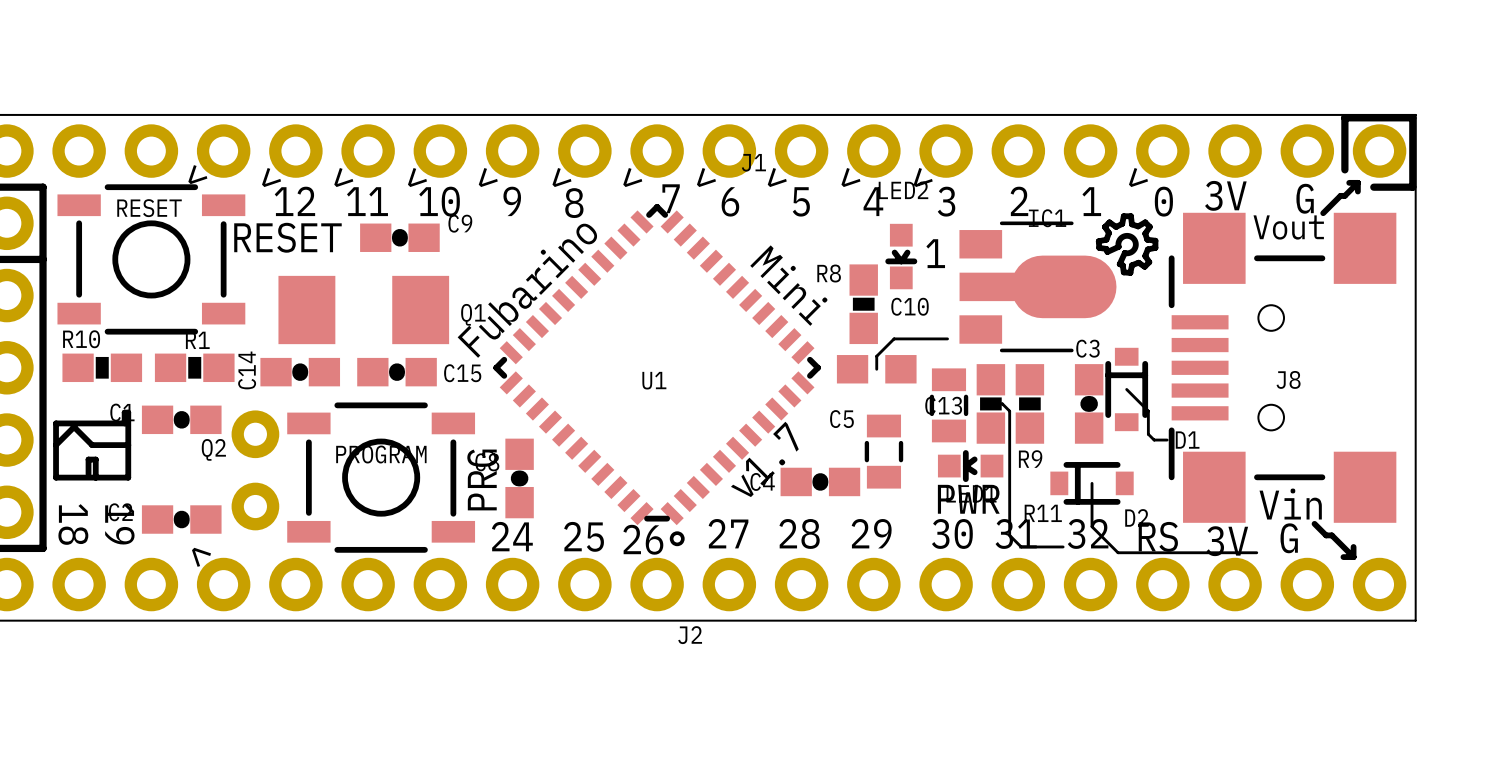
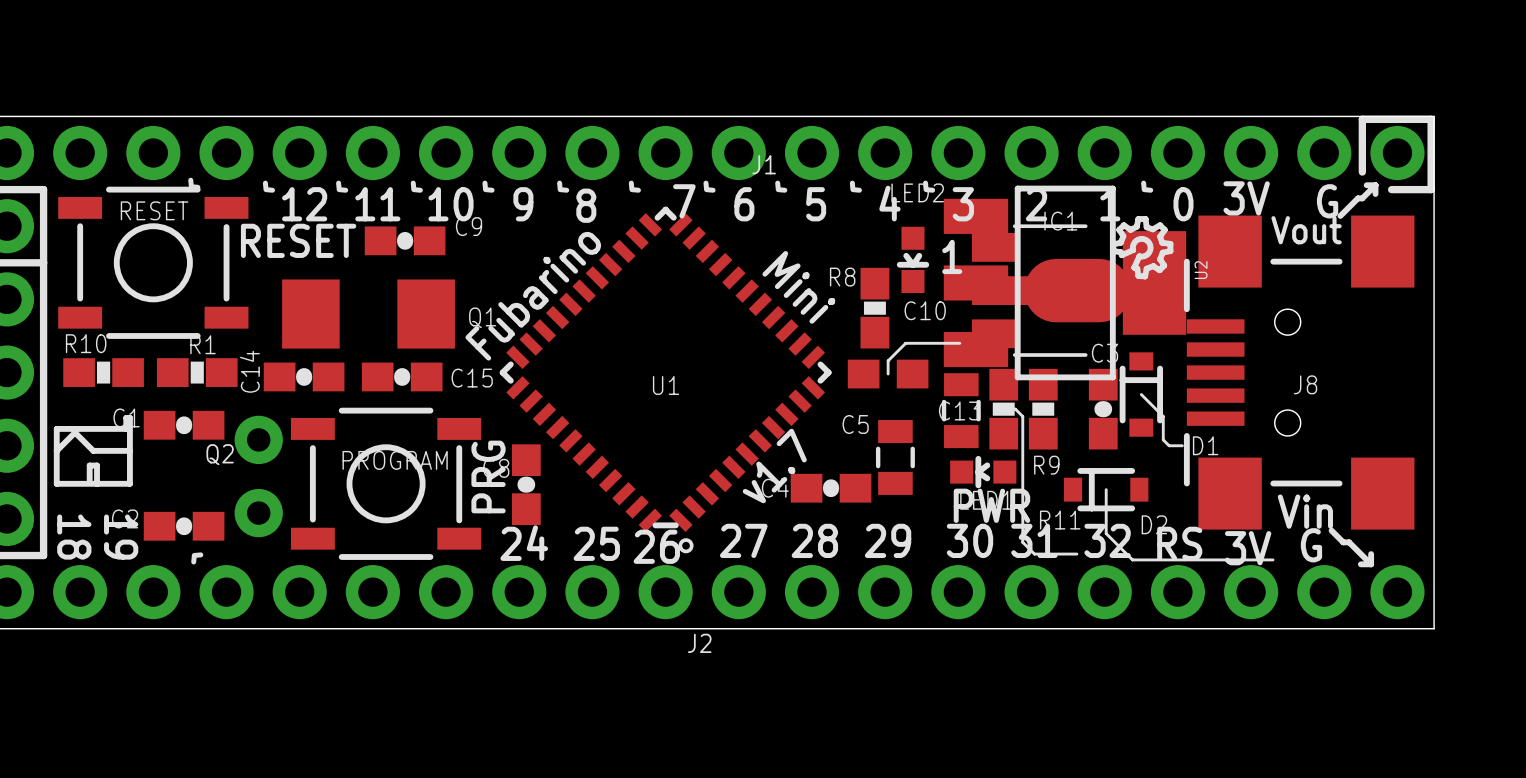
U2: none -> (1065, 282)

